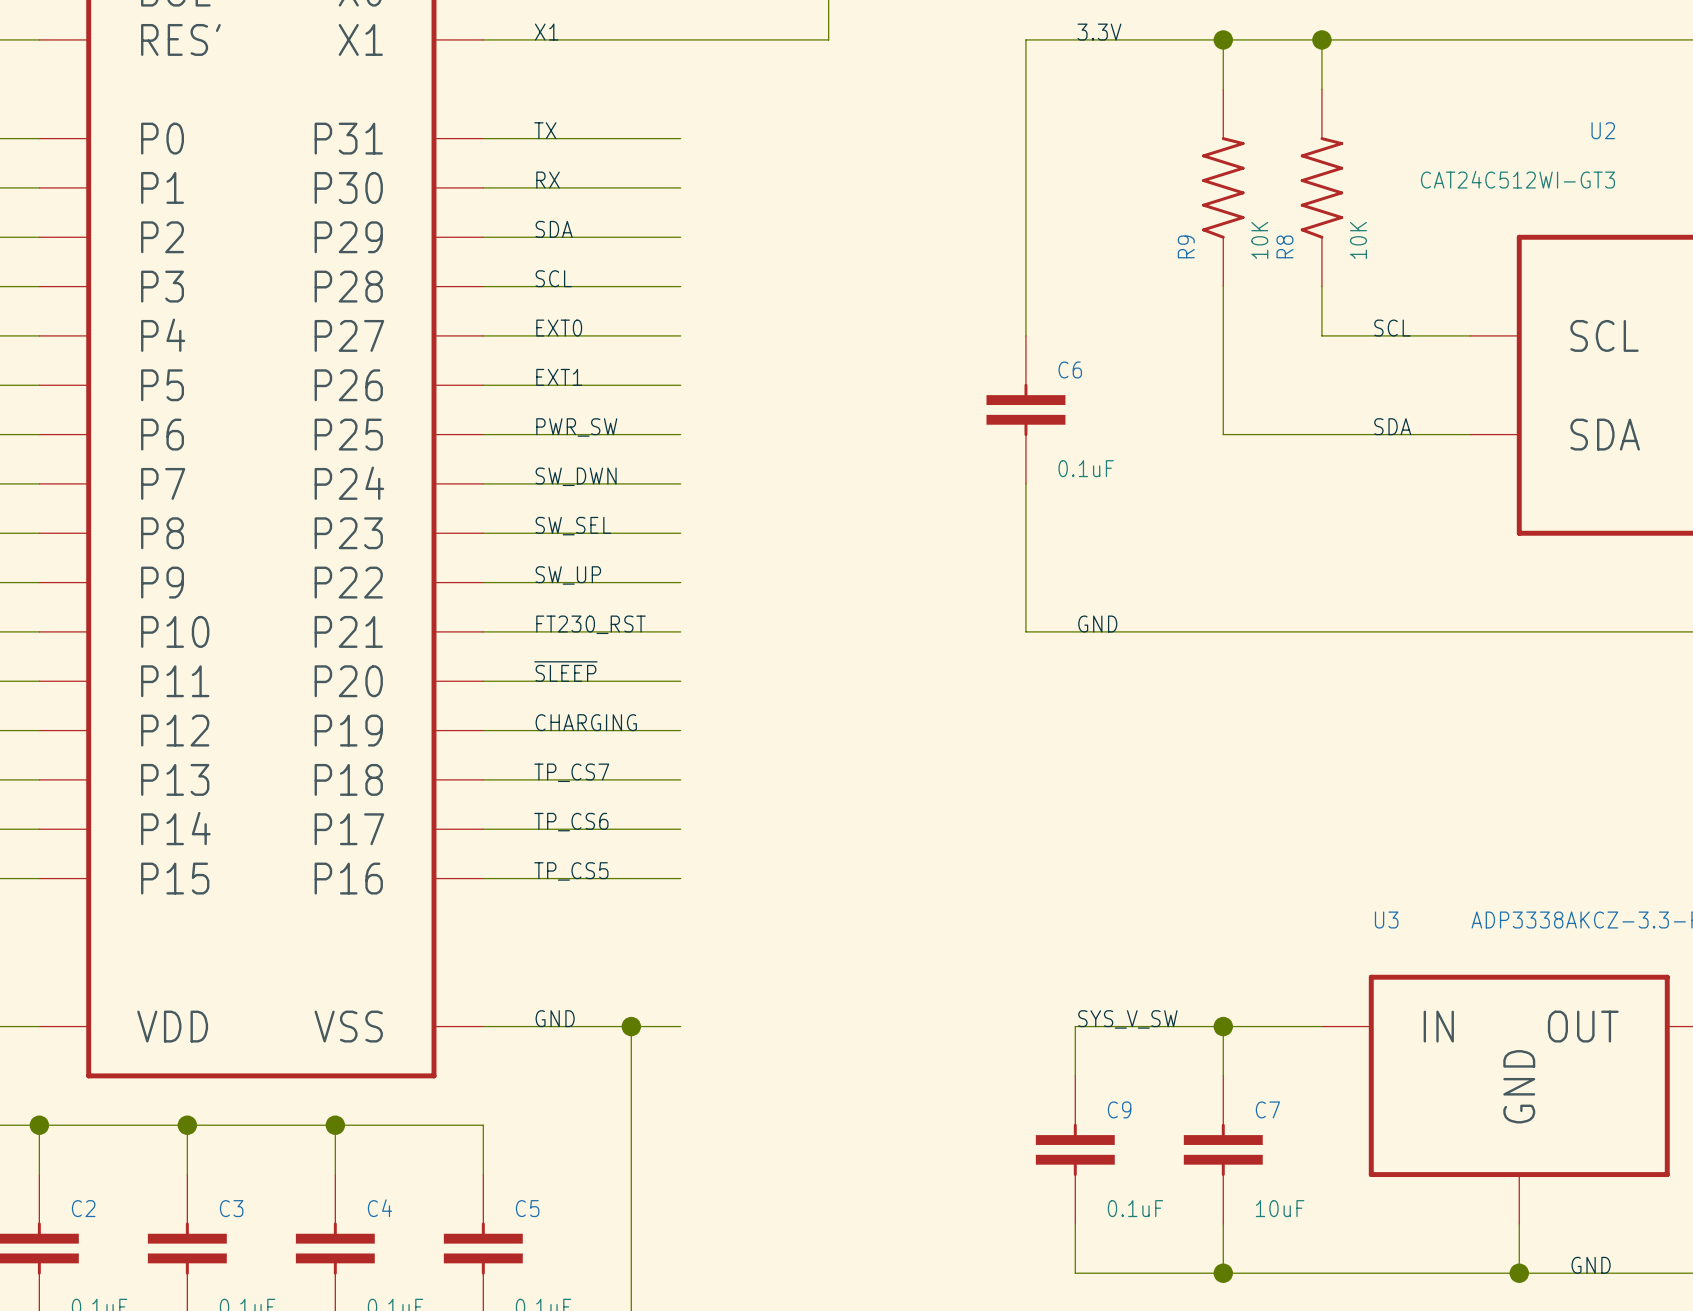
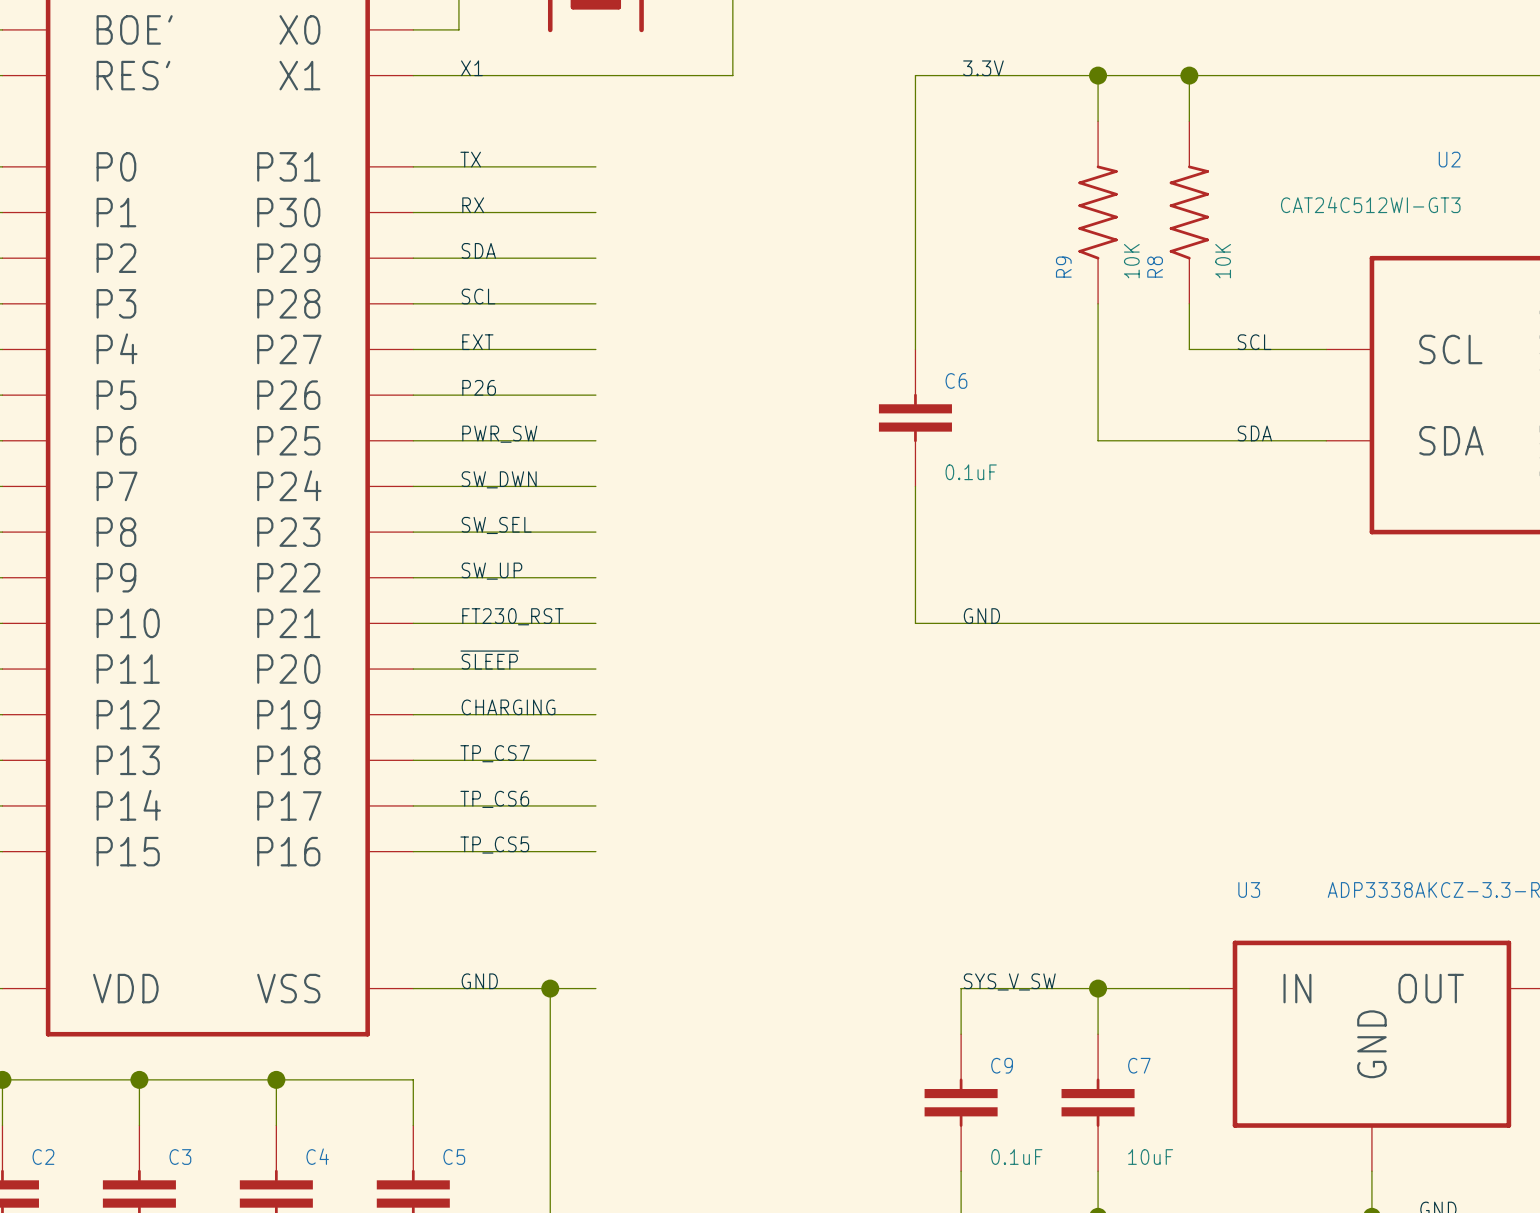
label: EXT0 (559, 328) -> EXT (477, 342)
label: EXT1 (559, 377) -> P26 (479, 387)

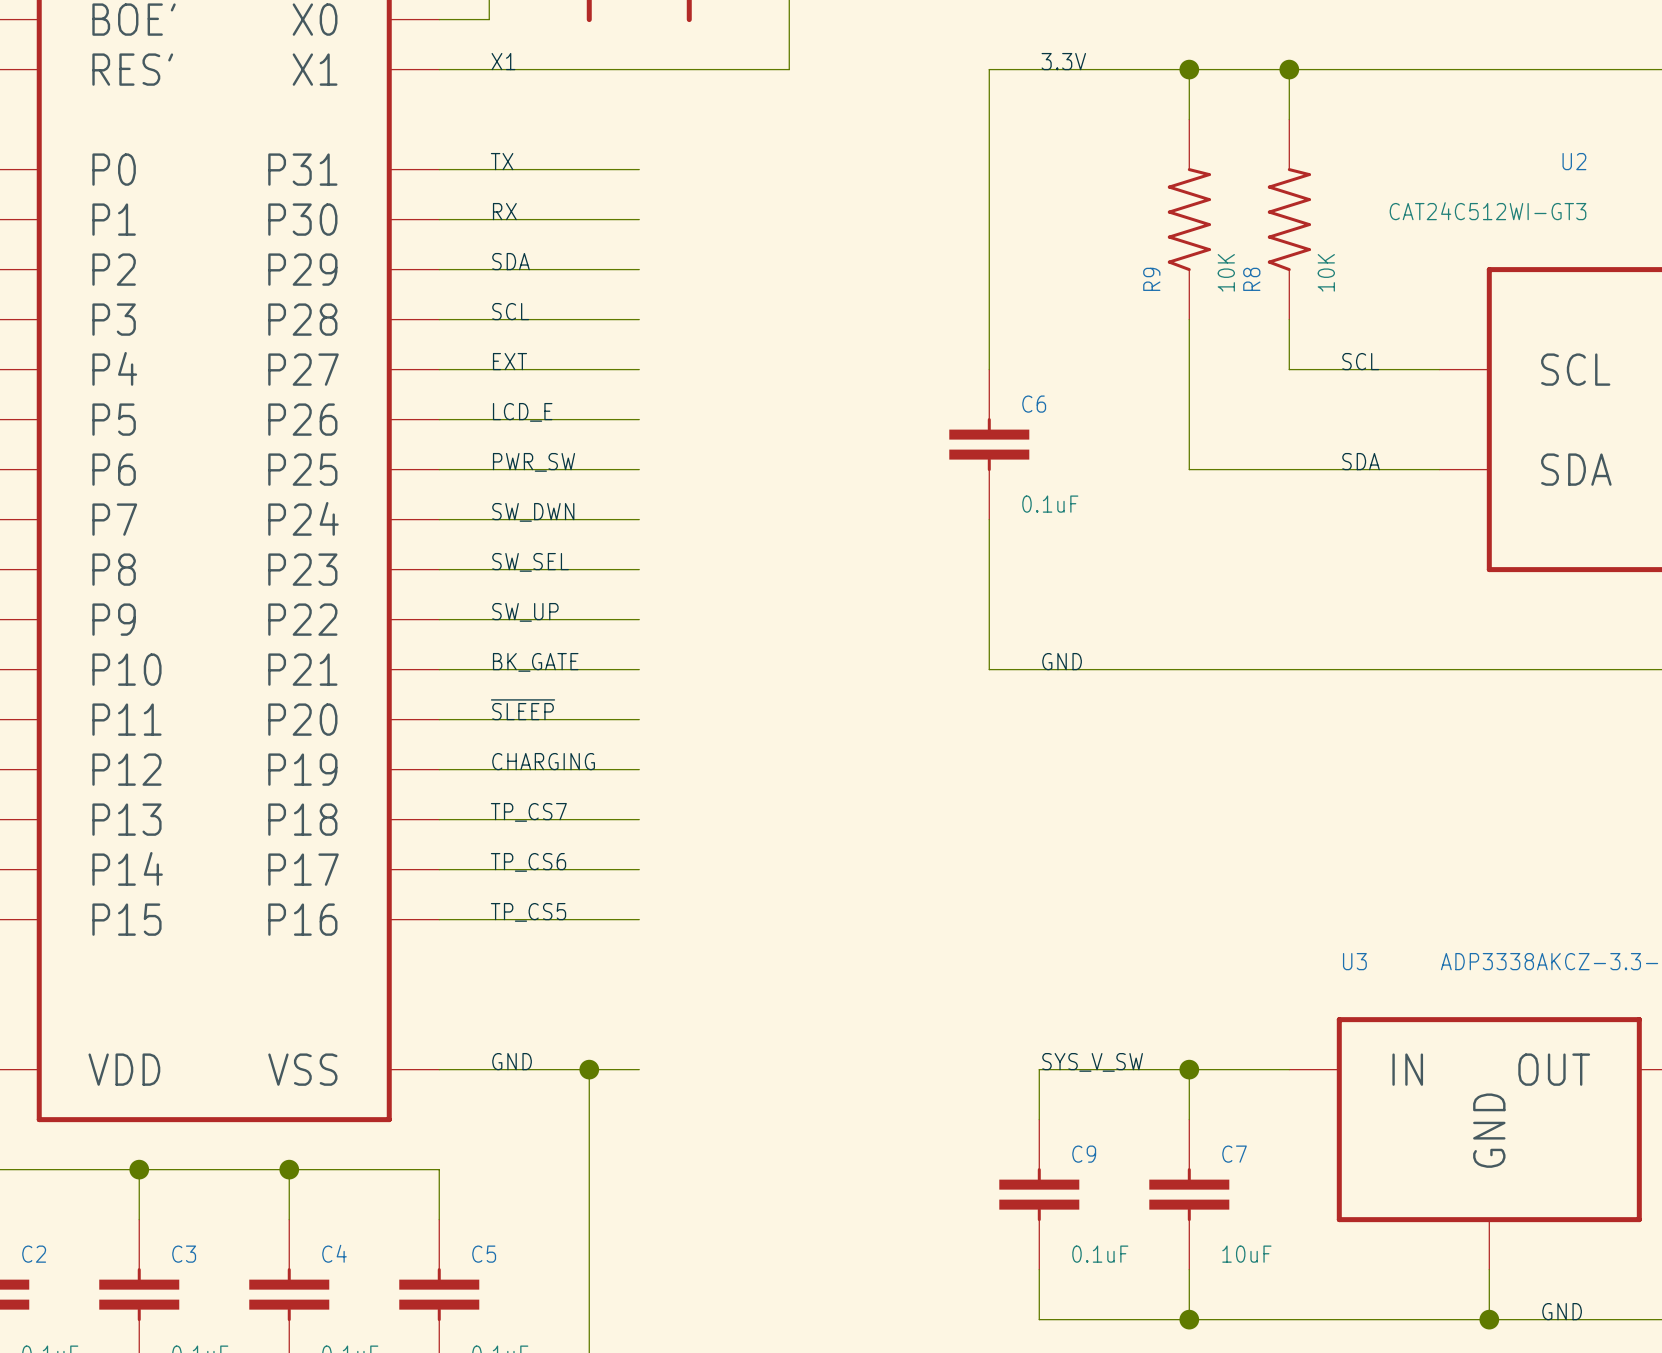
label: P26 (479, 387) -> LCD_E (522, 412)
label: FT230_RST (512, 616) -> BK_GATE (535, 662)

